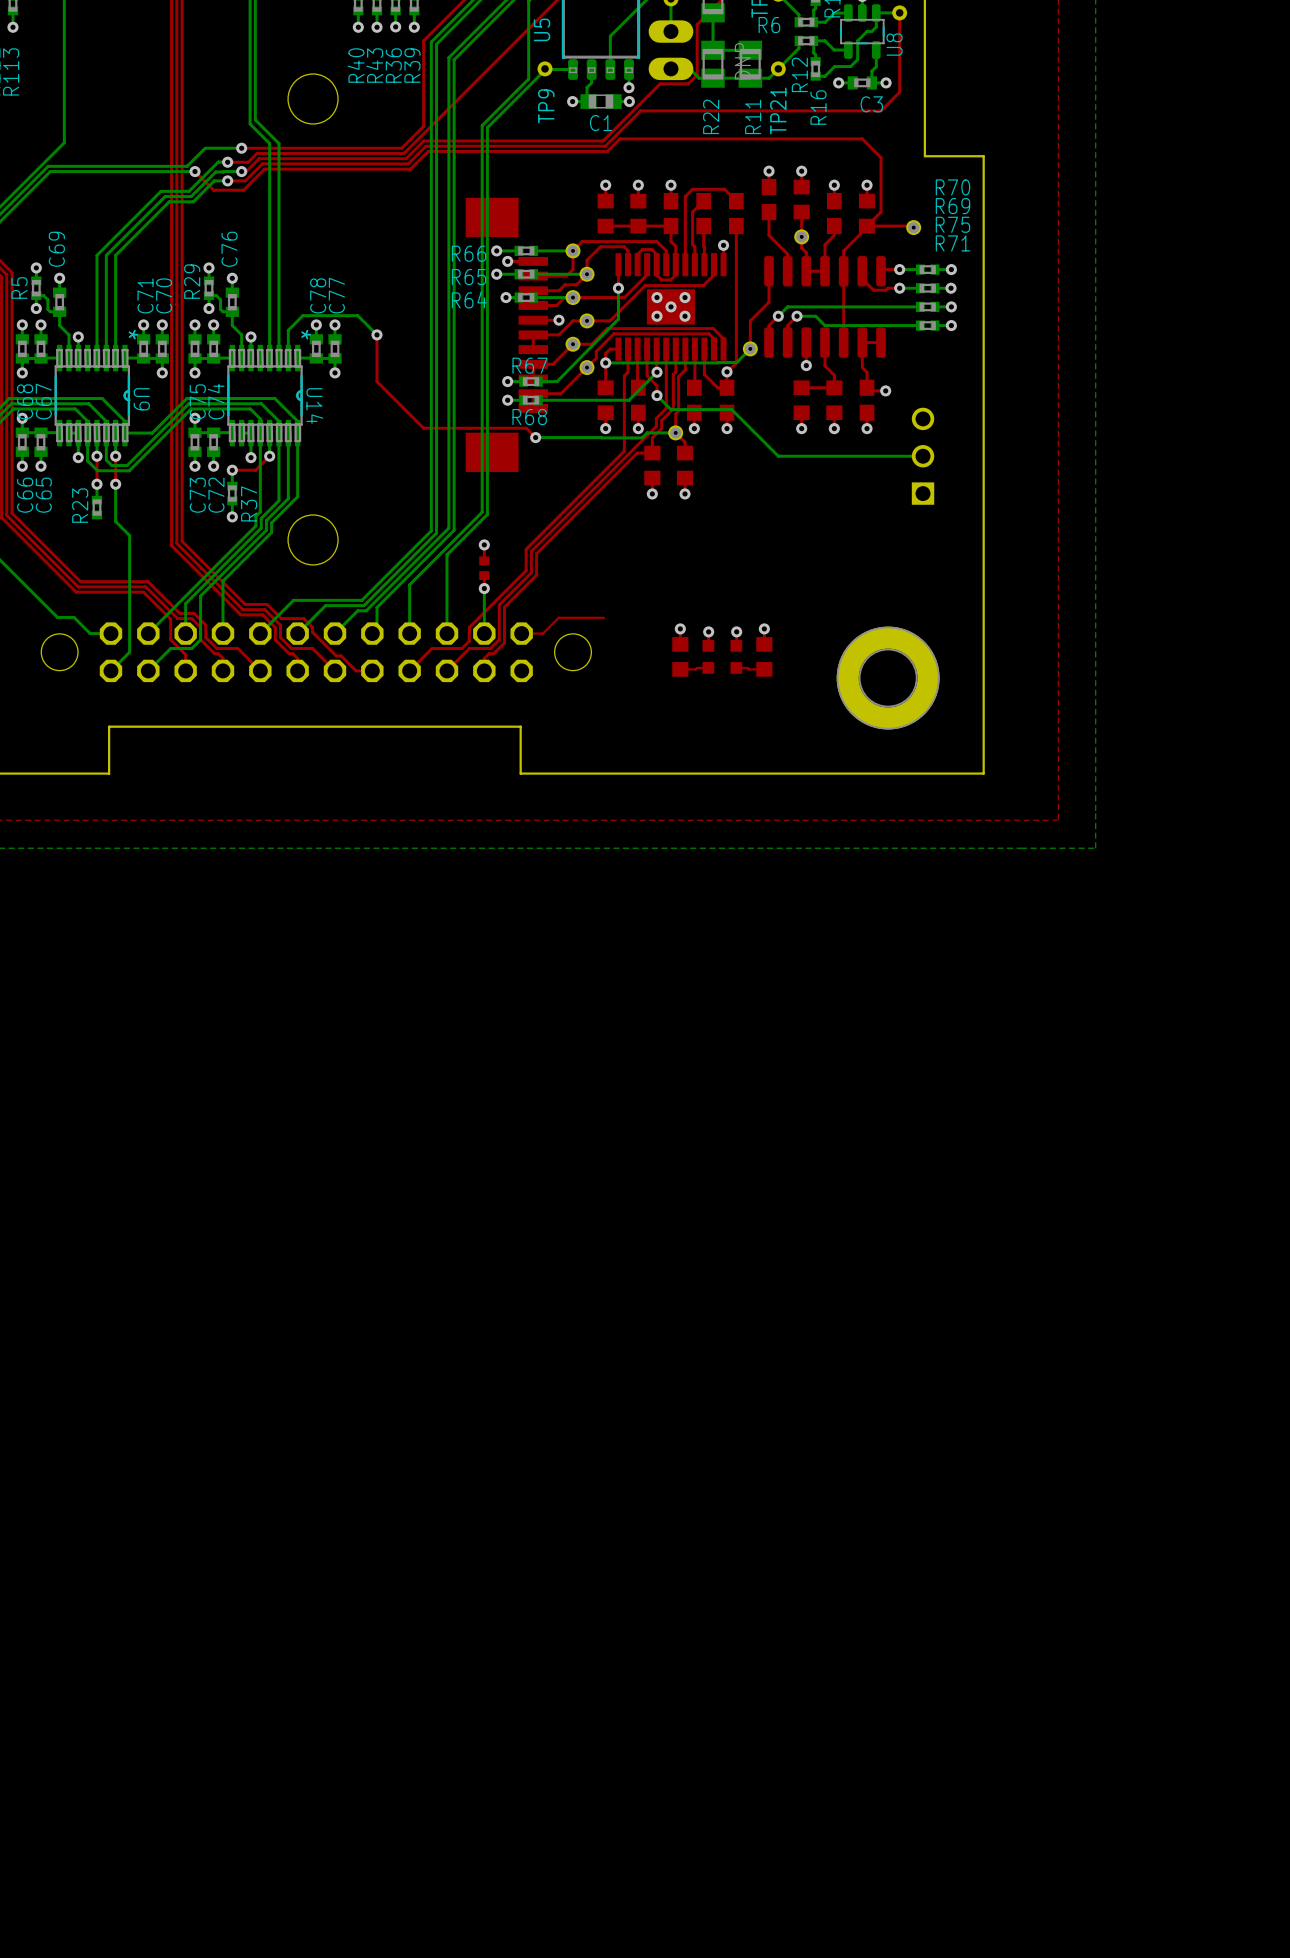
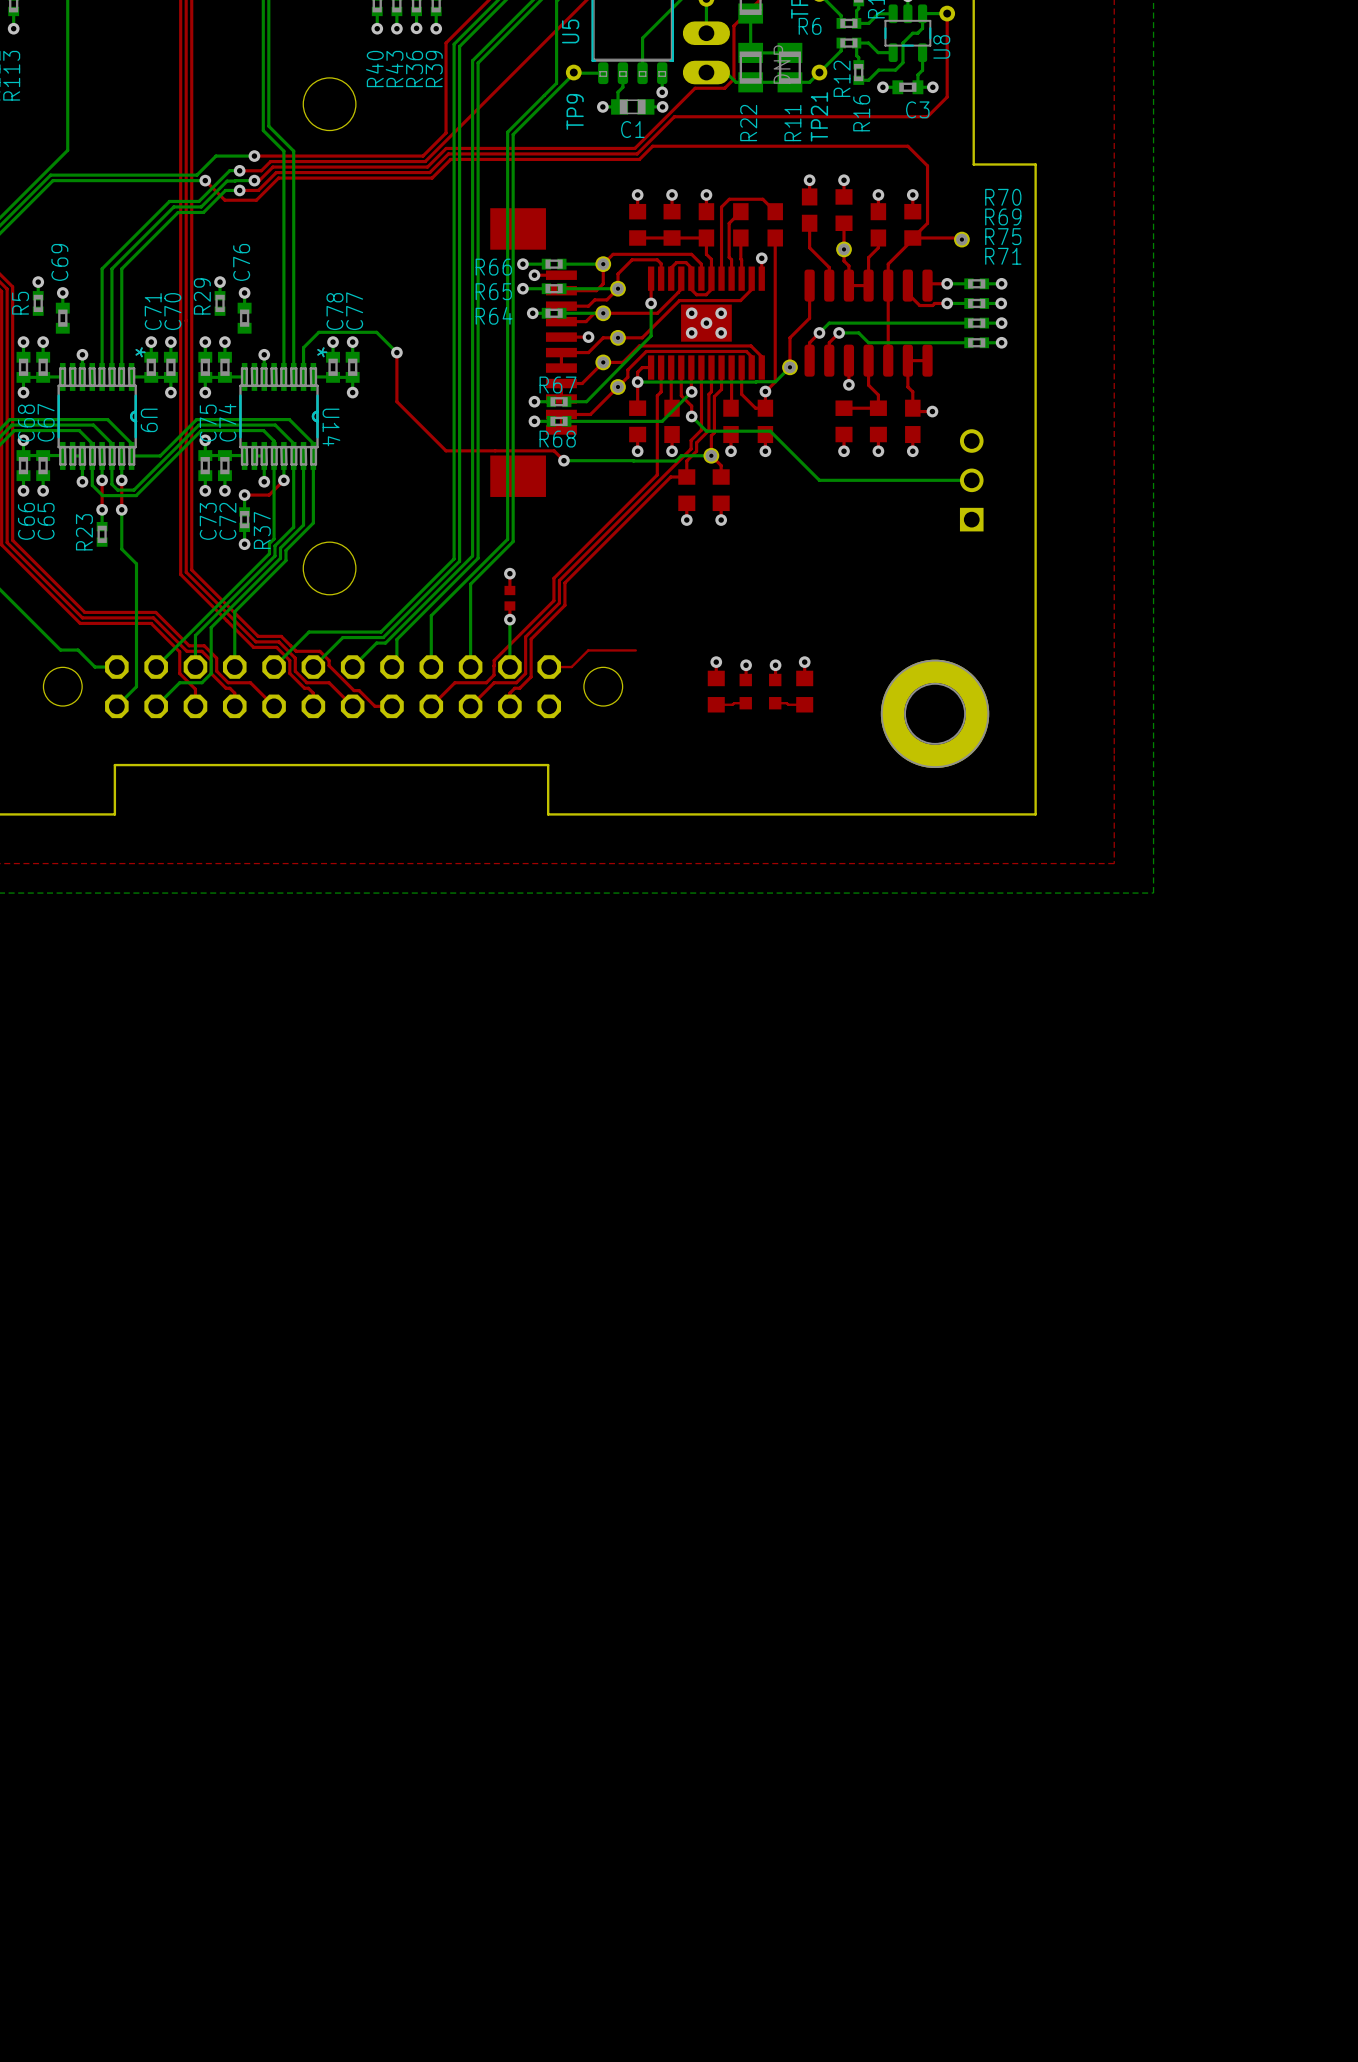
bottom track: (36, 308) (36, 295) (43, 295) (47, 299) (47, 309) (50, 311) (59, 311) (59, 325) (68, 334) (68, 358) -> none
via: (36, 308) -> none
bottom track: (208, 308) (208, 295) (216, 295) (220, 299) (220, 309) (222, 311) (232, 311) (232, 325) (241, 334) (241, 358) -> none
via: (208, 308) -> none

